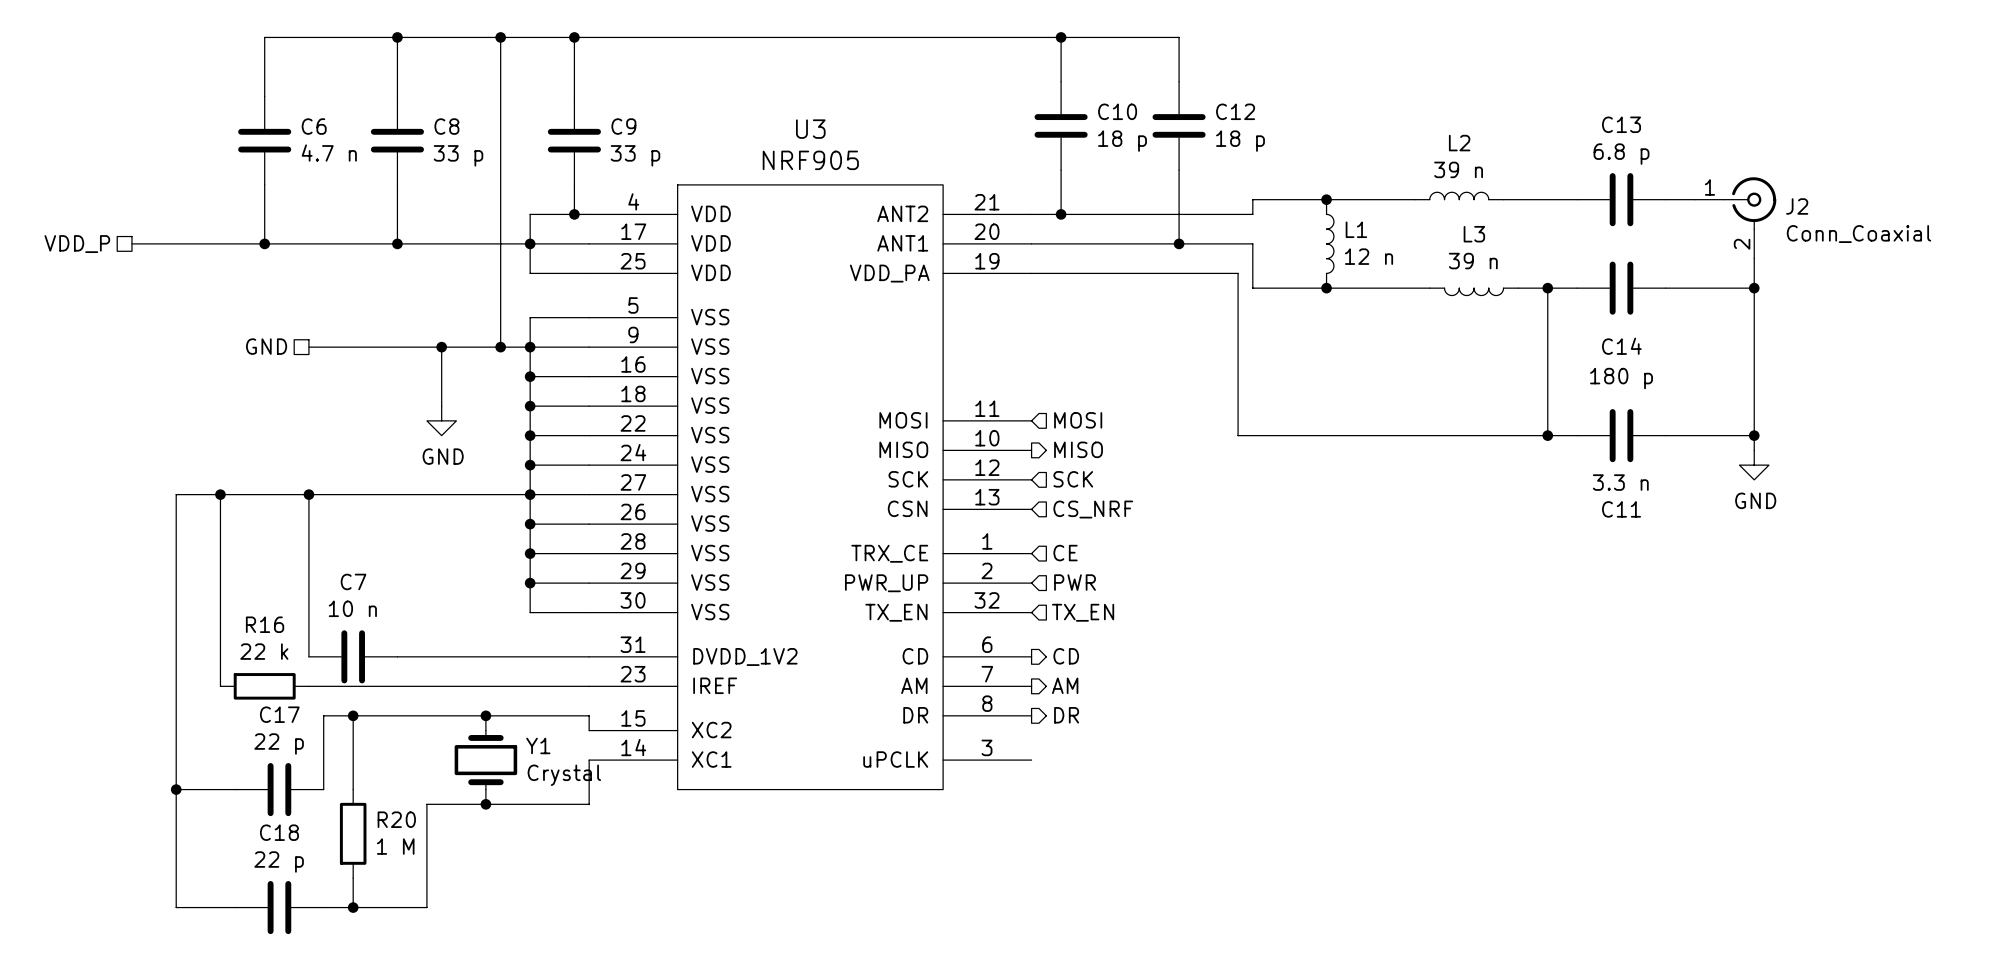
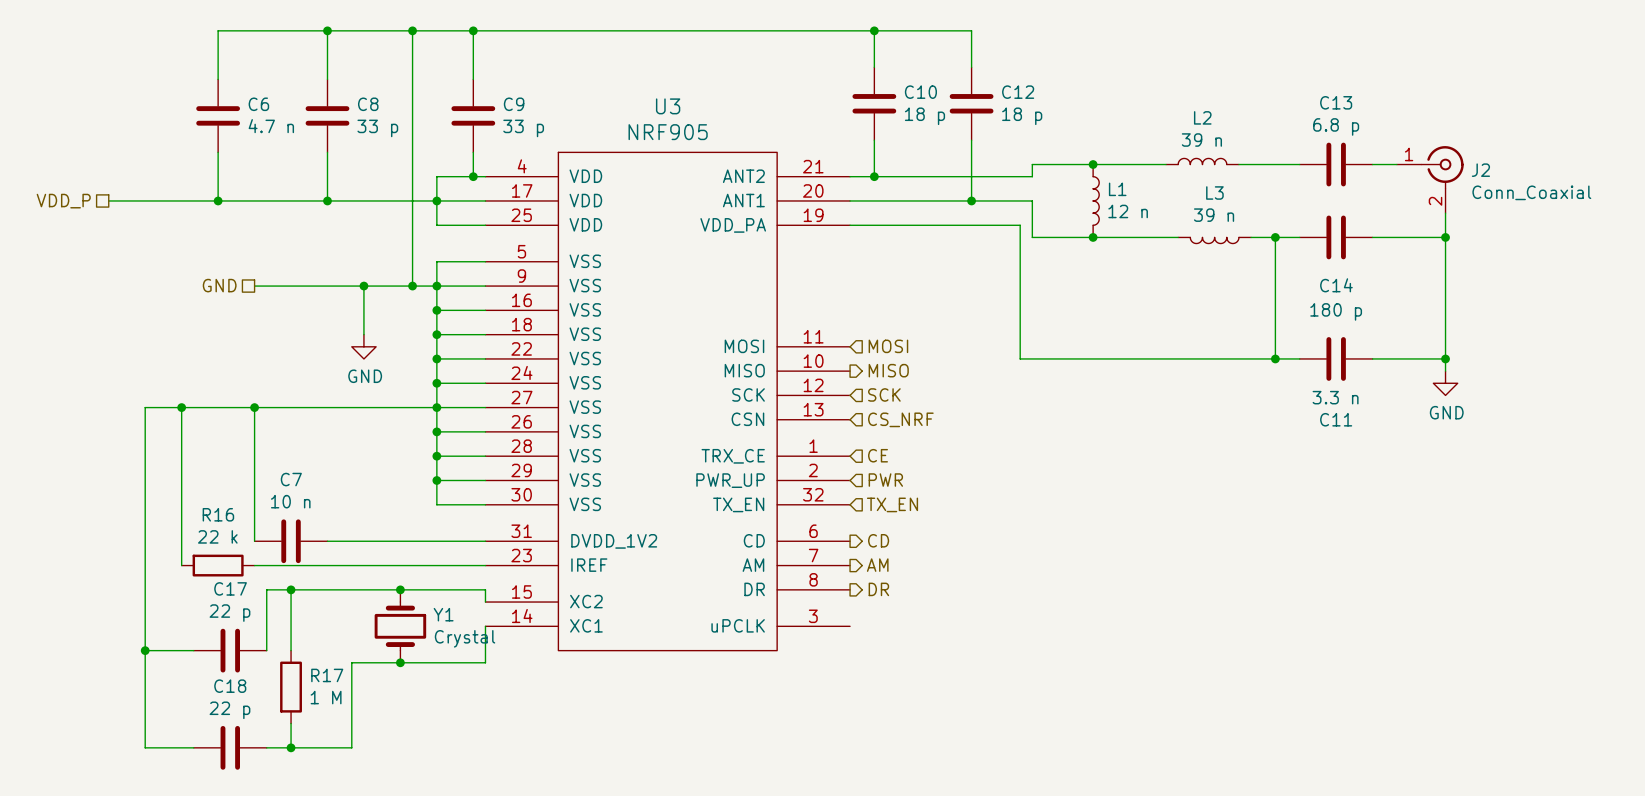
R20 name: R20 (396, 819) -> R17 (327, 675)

